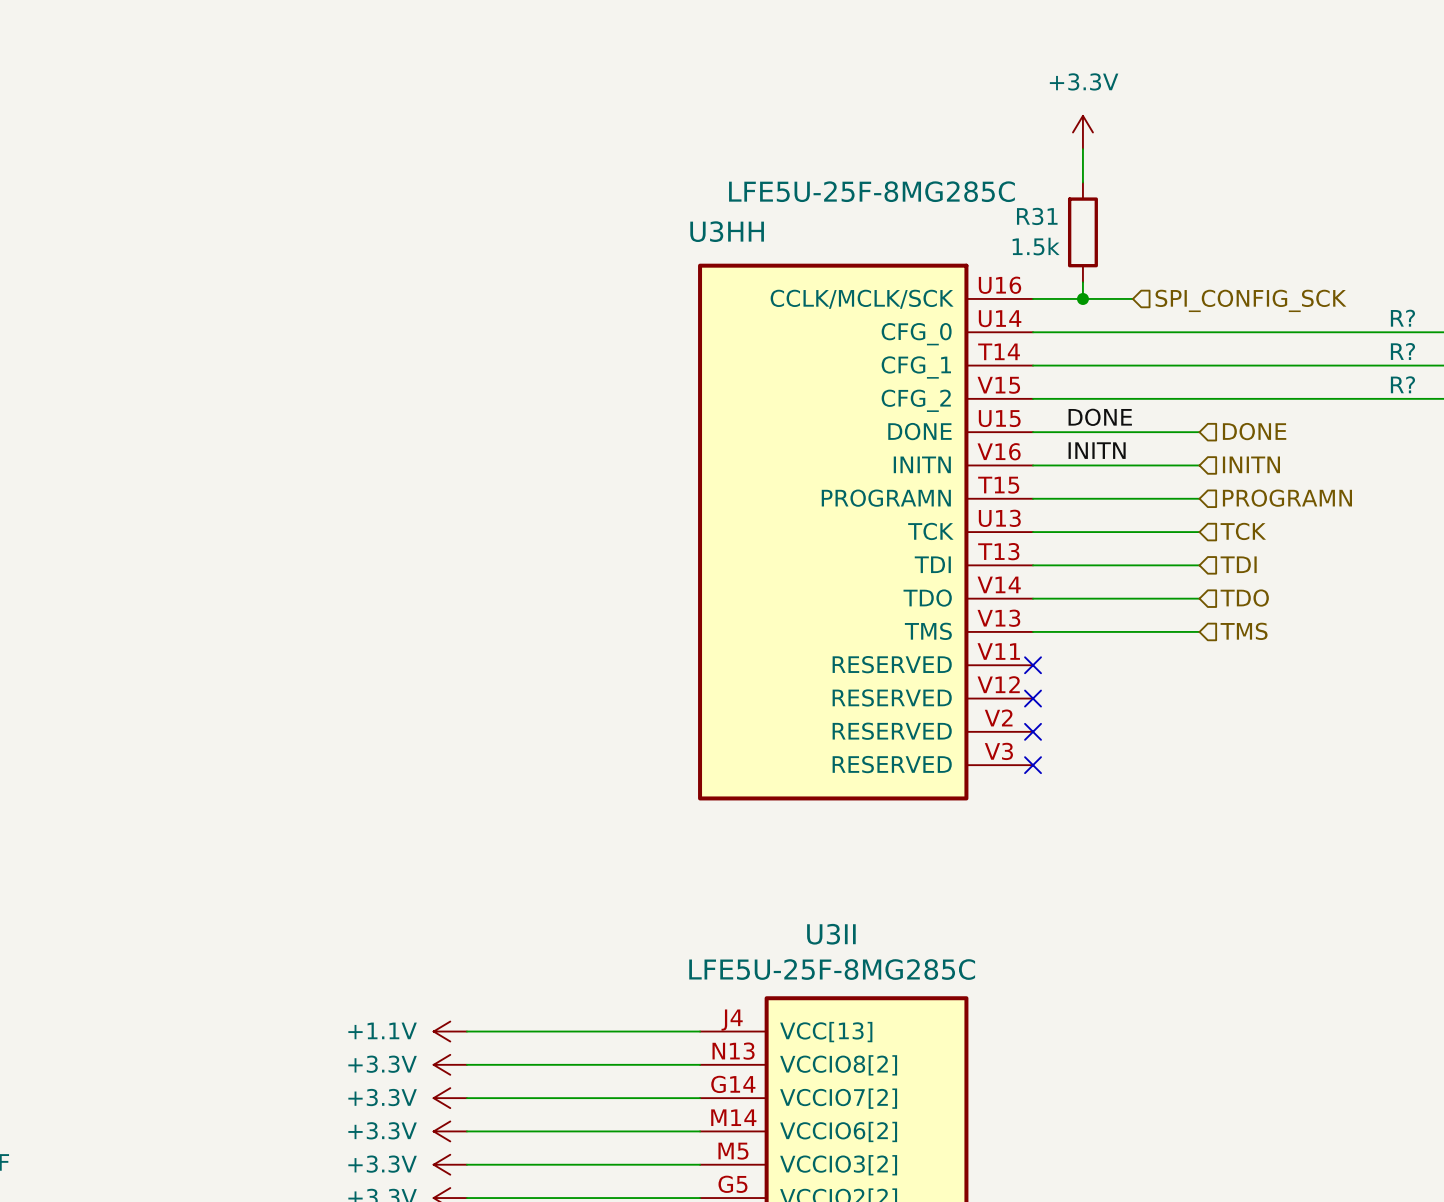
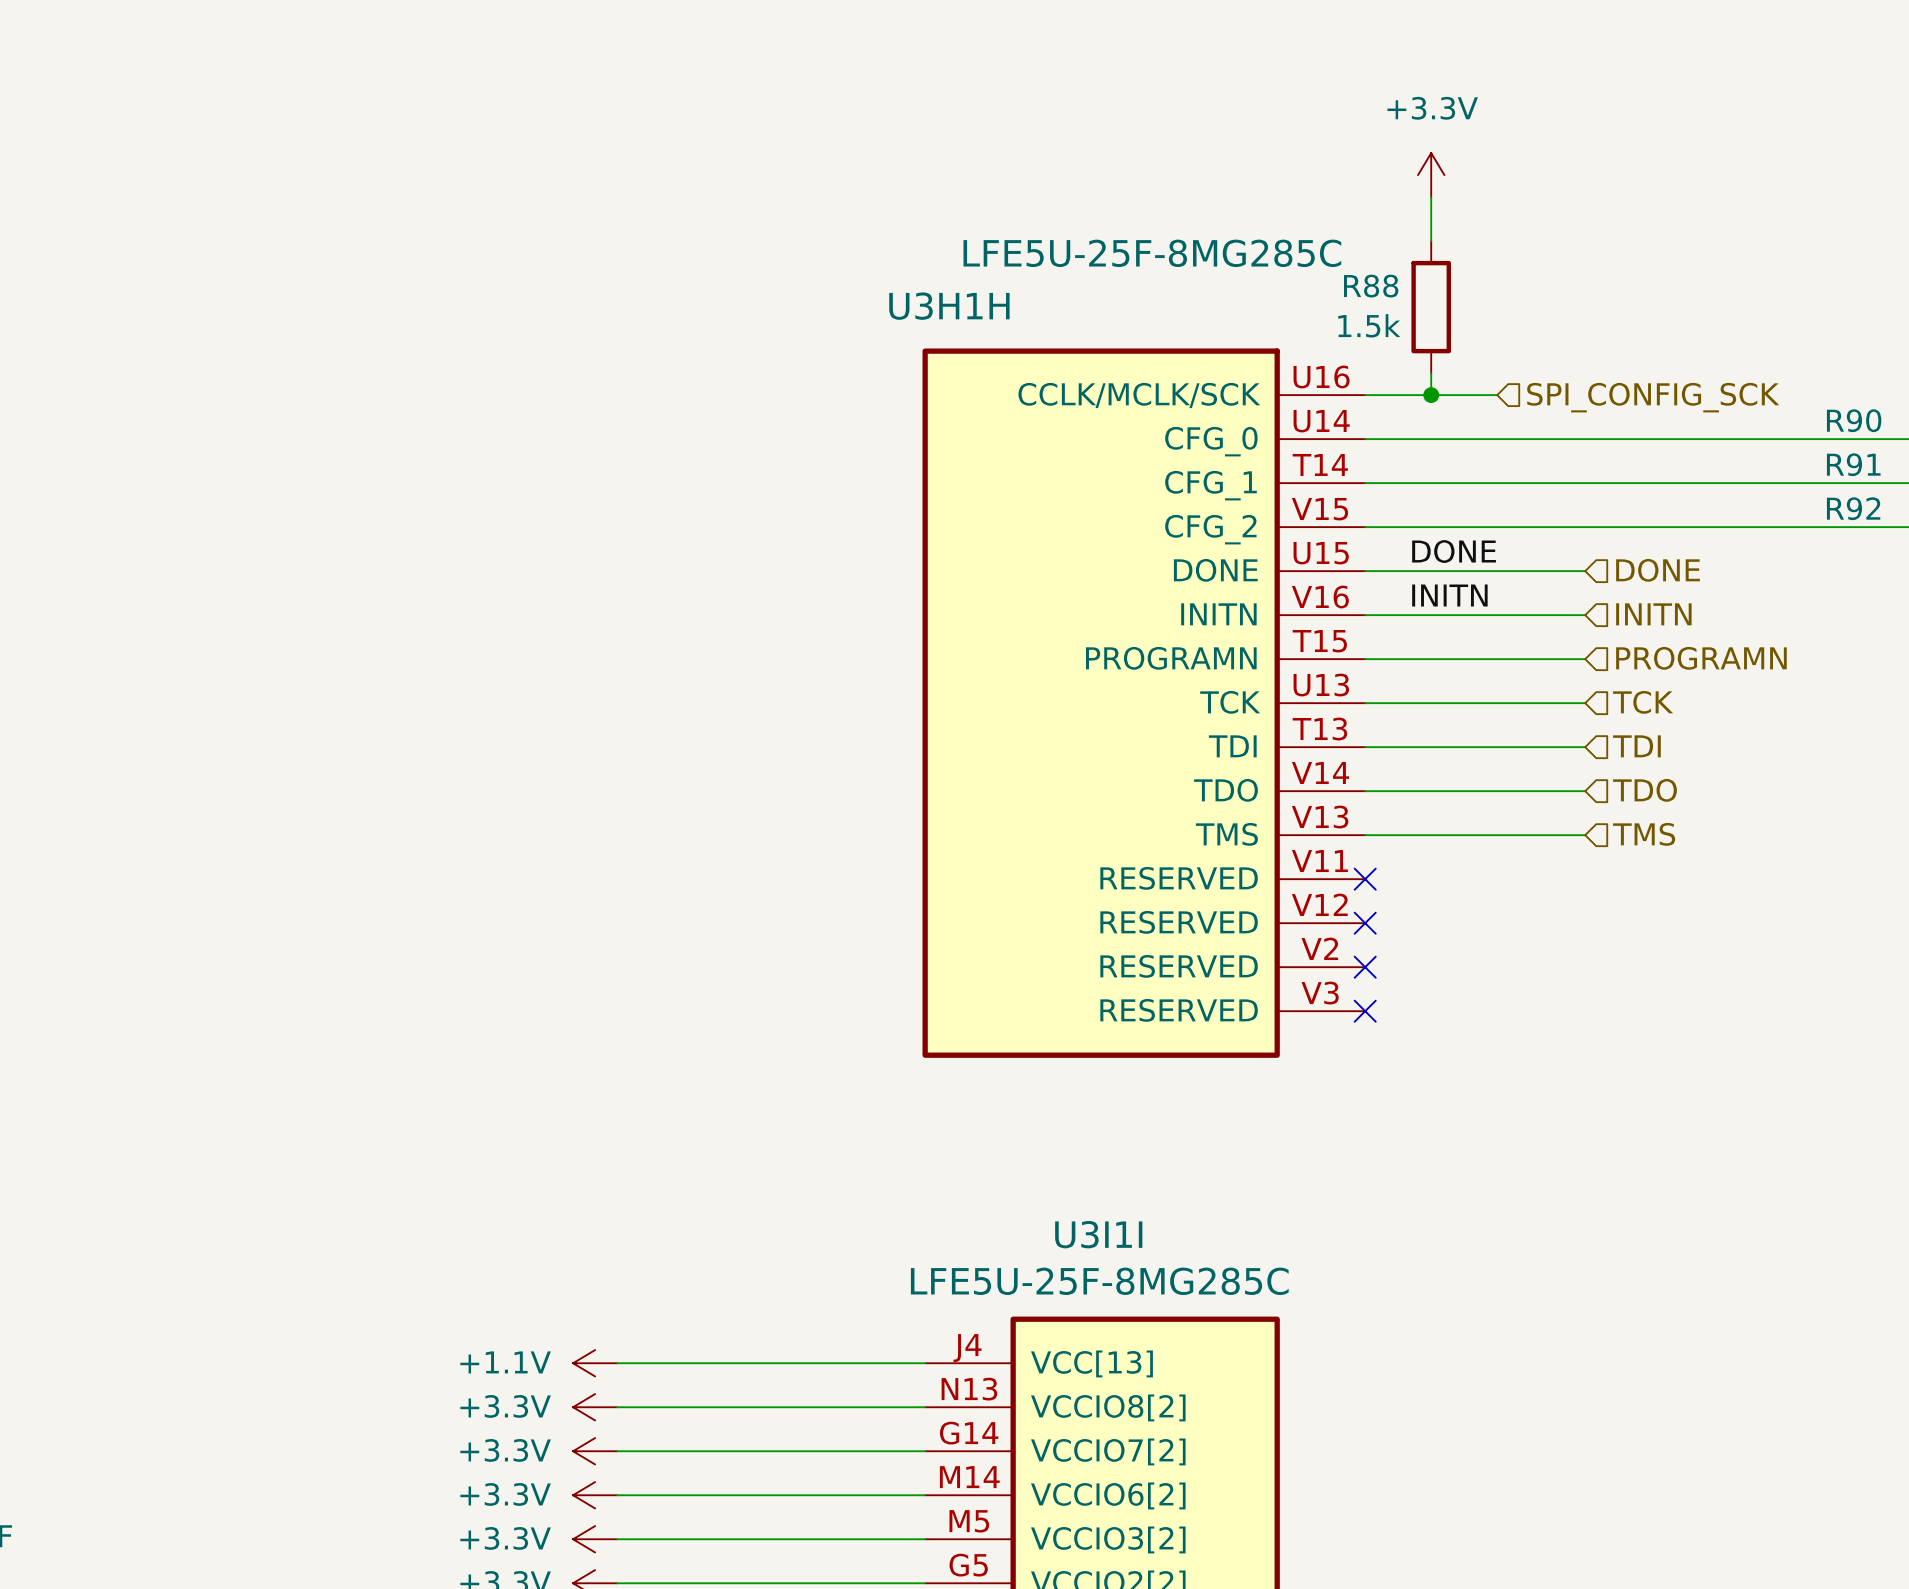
R31 name: R31 (1037, 216) -> R88 (1371, 286)
U3HH name: U3HH (727, 231) -> U3H1H (949, 306)
R? name: R? (1402, 318) -> R90 (1854, 420)
R? name: R? (1402, 351) -> R91 (1853, 464)
R? name: R? (1402, 384) -> R92 (1853, 508)
U3II name: U3II (831, 934) -> U3I1I (1098, 1234)

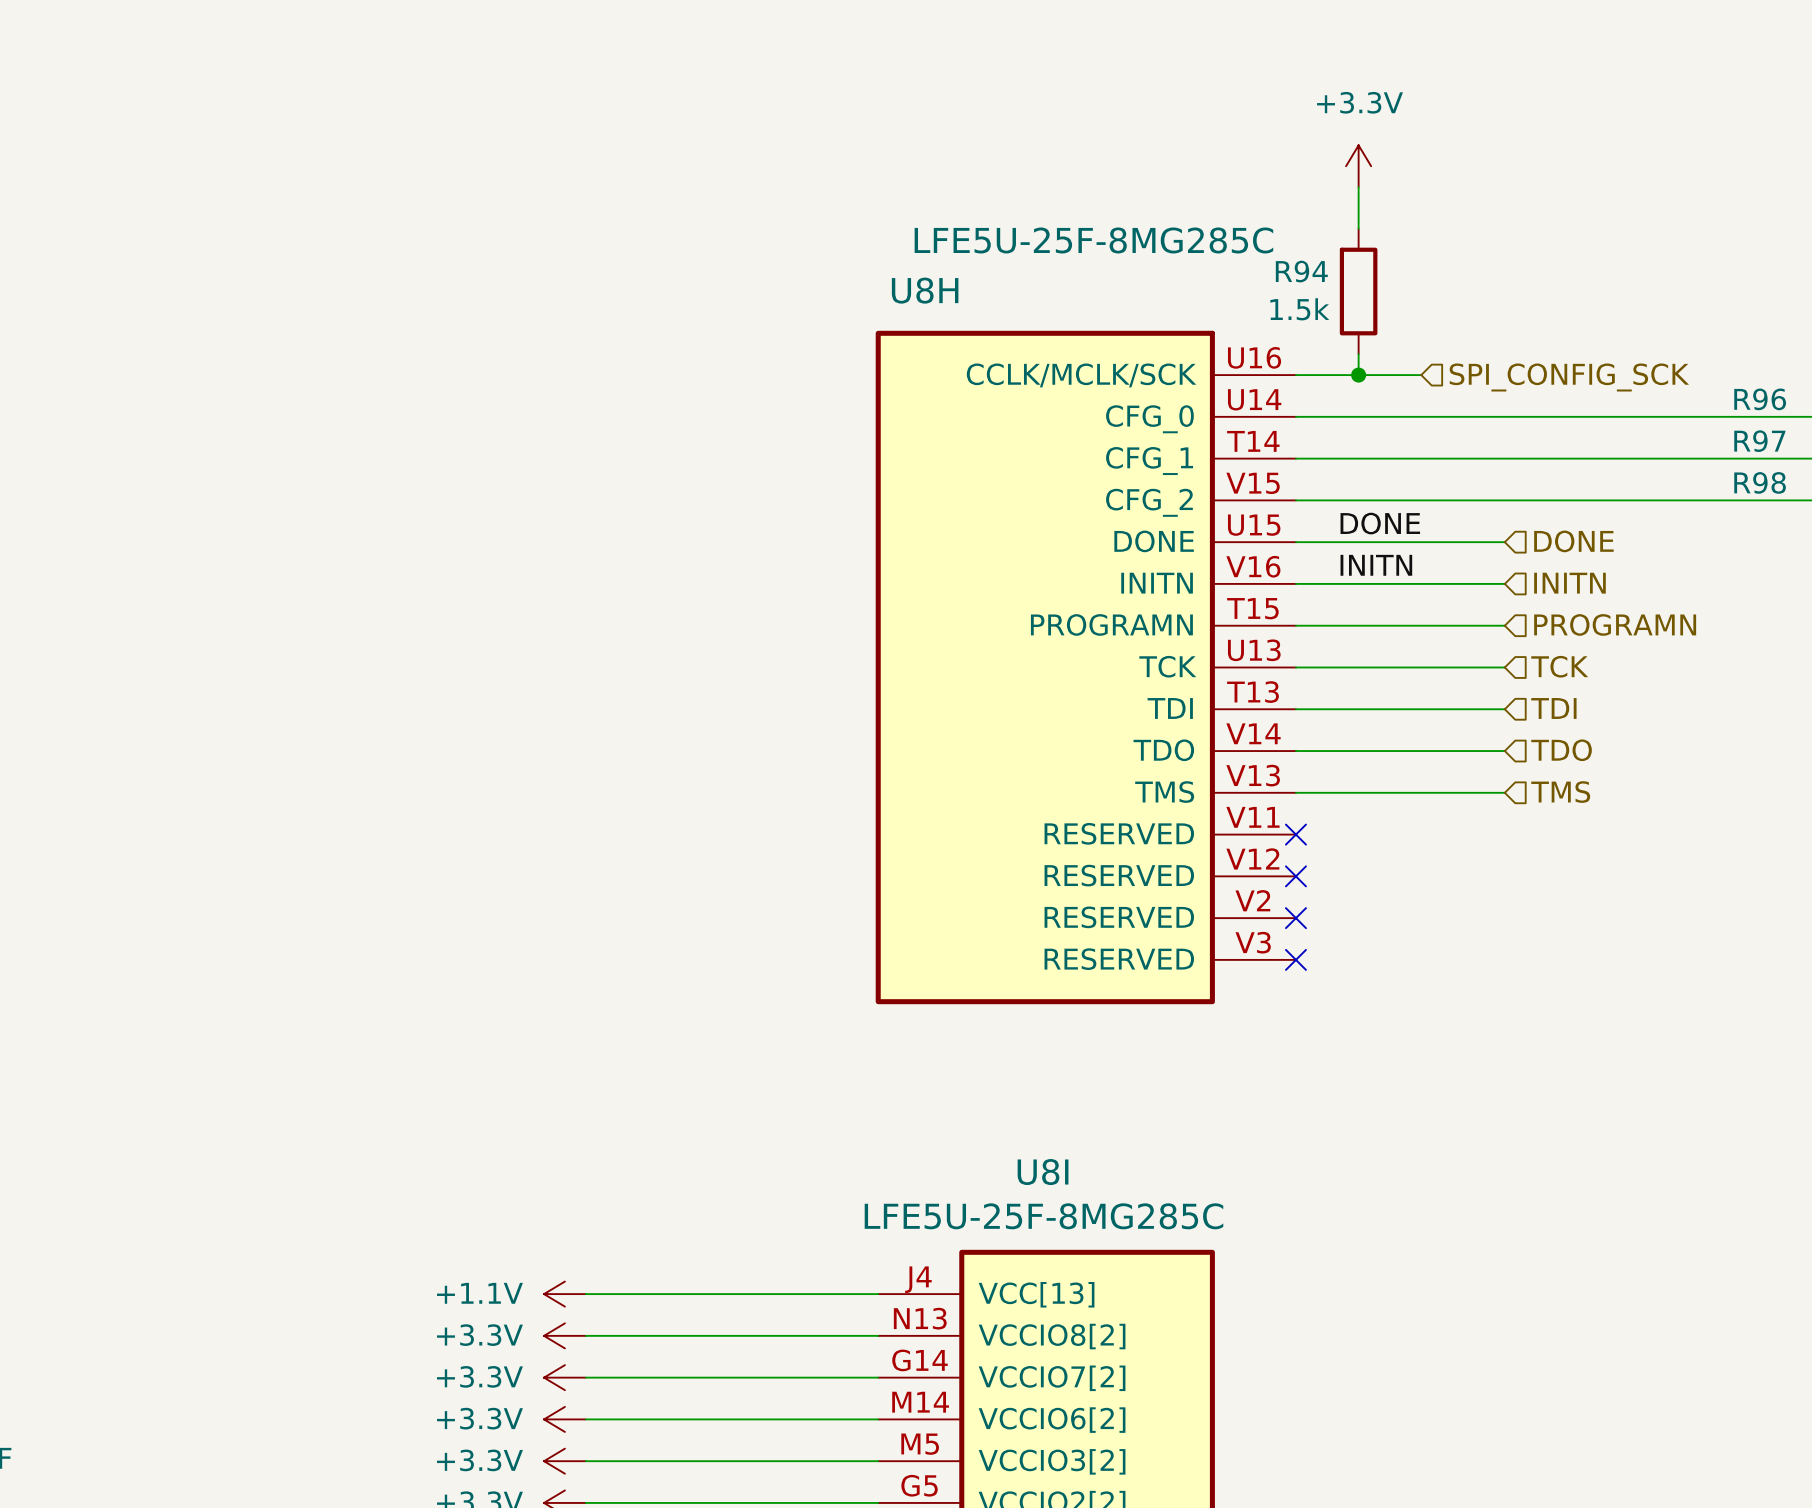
R88 name: R88 (1371, 286) -> R94 (1301, 271)
U3H1H name: U3H1H (949, 306) -> U8H (925, 290)
R90 name: R90 (1854, 420) -> R96 (1760, 399)
R91 name: R91 (1853, 464) -> R97 (1759, 441)
R92 name: R92 (1853, 508) -> R98 (1760, 482)
U3I1I name: U3I1I (1098, 1234) -> U8I (1043, 1172)

